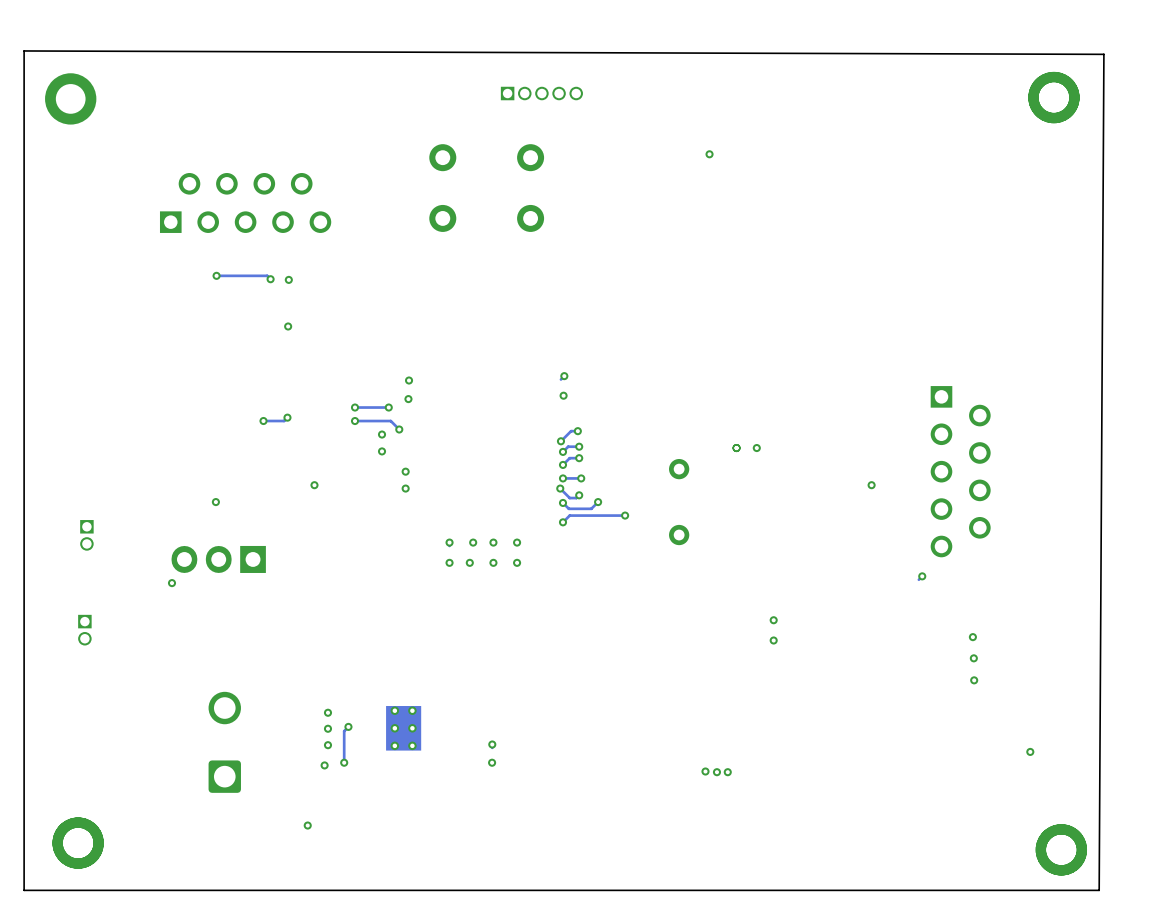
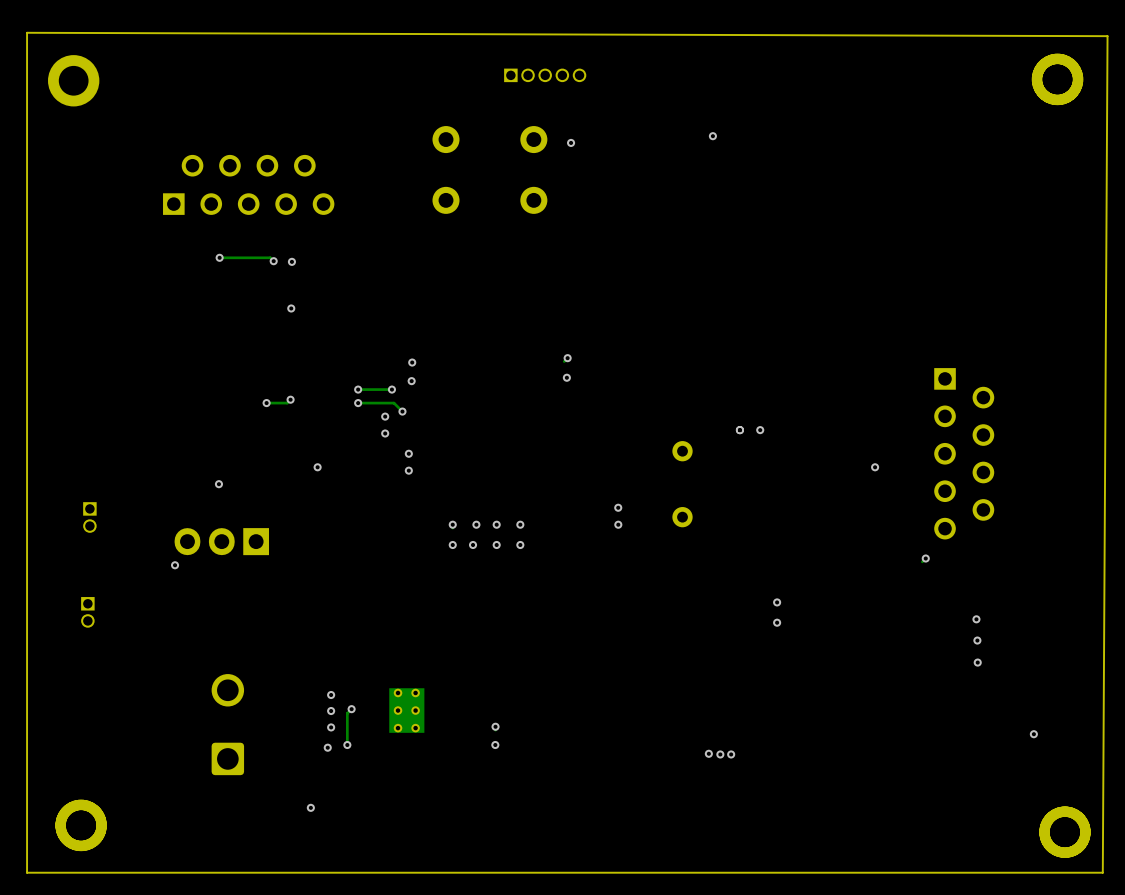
via: none -> (571, 142)
track: (577, 431) (571, 431) (560, 441) -> none
via: (577, 431) -> none
via: (560, 441) -> none
track: (579, 446) (568, 446) (562, 451) -> none
via: (579, 446) -> none
via: (562, 451) -> none
track: (579, 458) (569, 458) (562, 464) -> none
via: (579, 458) -> none
via: (562, 464) -> none
via: (562, 478) -> none
track: (581, 478) (562, 478) -> none
via: (581, 478) -> none
track: (560, 488) (569, 498) (576, 498) (579, 495) -> none
via: (560, 488) -> none
via: (579, 495) -> none
via: (562, 502) -> none
track: (598, 502) (591, 508) (568, 508) (562, 502) -> none
via: (598, 502) -> none
track: (625, 515) (569, 515) (562, 522) -> none
via: (625, 515) -> none
via: (562, 522) -> none
via: none -> (618, 507)
via: none -> (618, 524)

